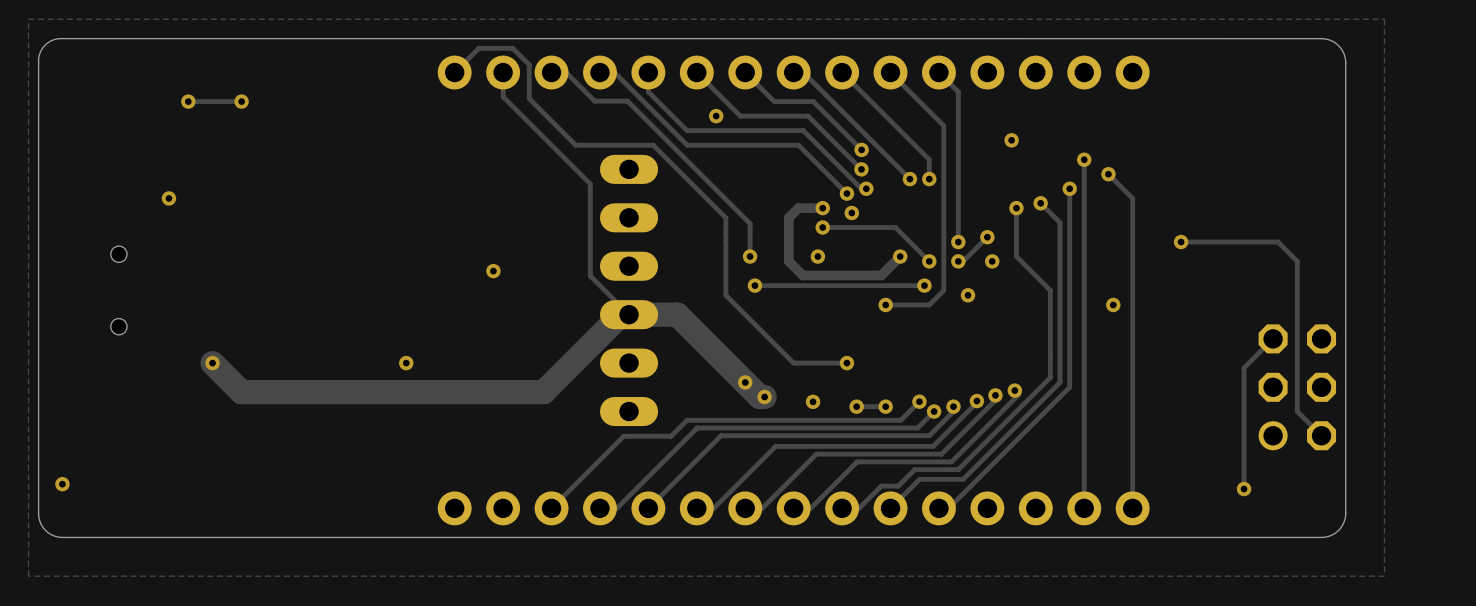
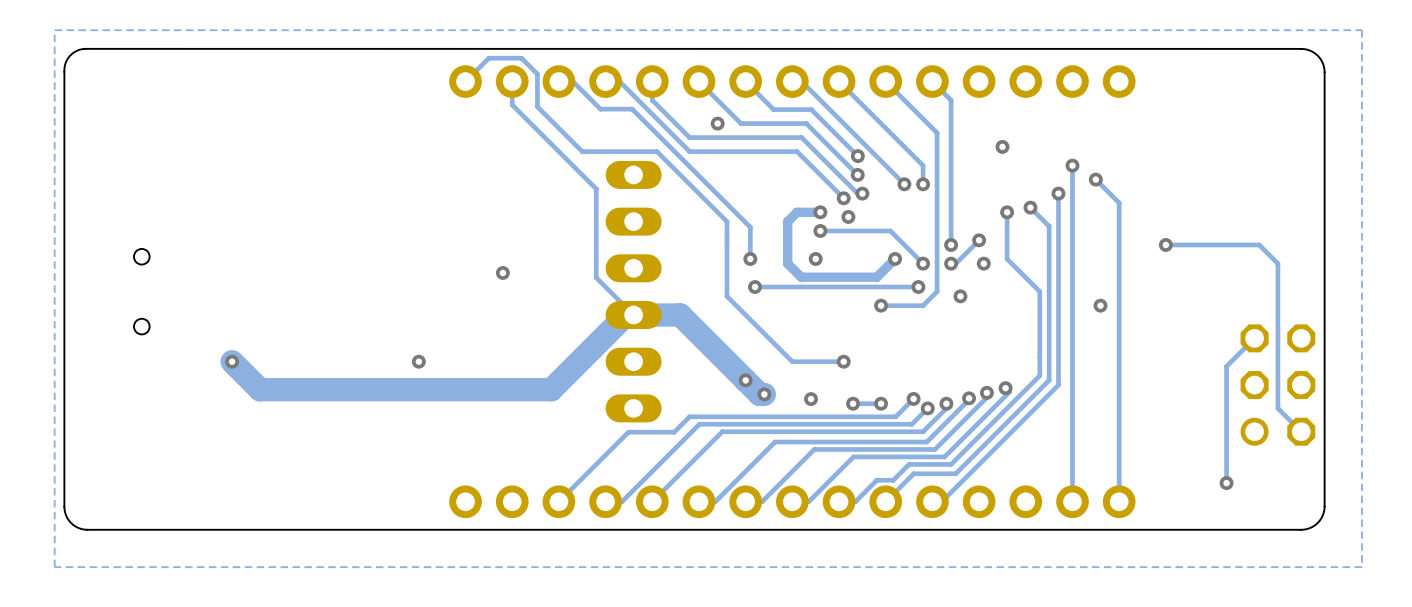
via: (188, 101) -> none
track: (241, 101) (188, 101) -> none
via: (241, 101) -> none
via: (168, 198) -> none
via: (62, 484) -> none

